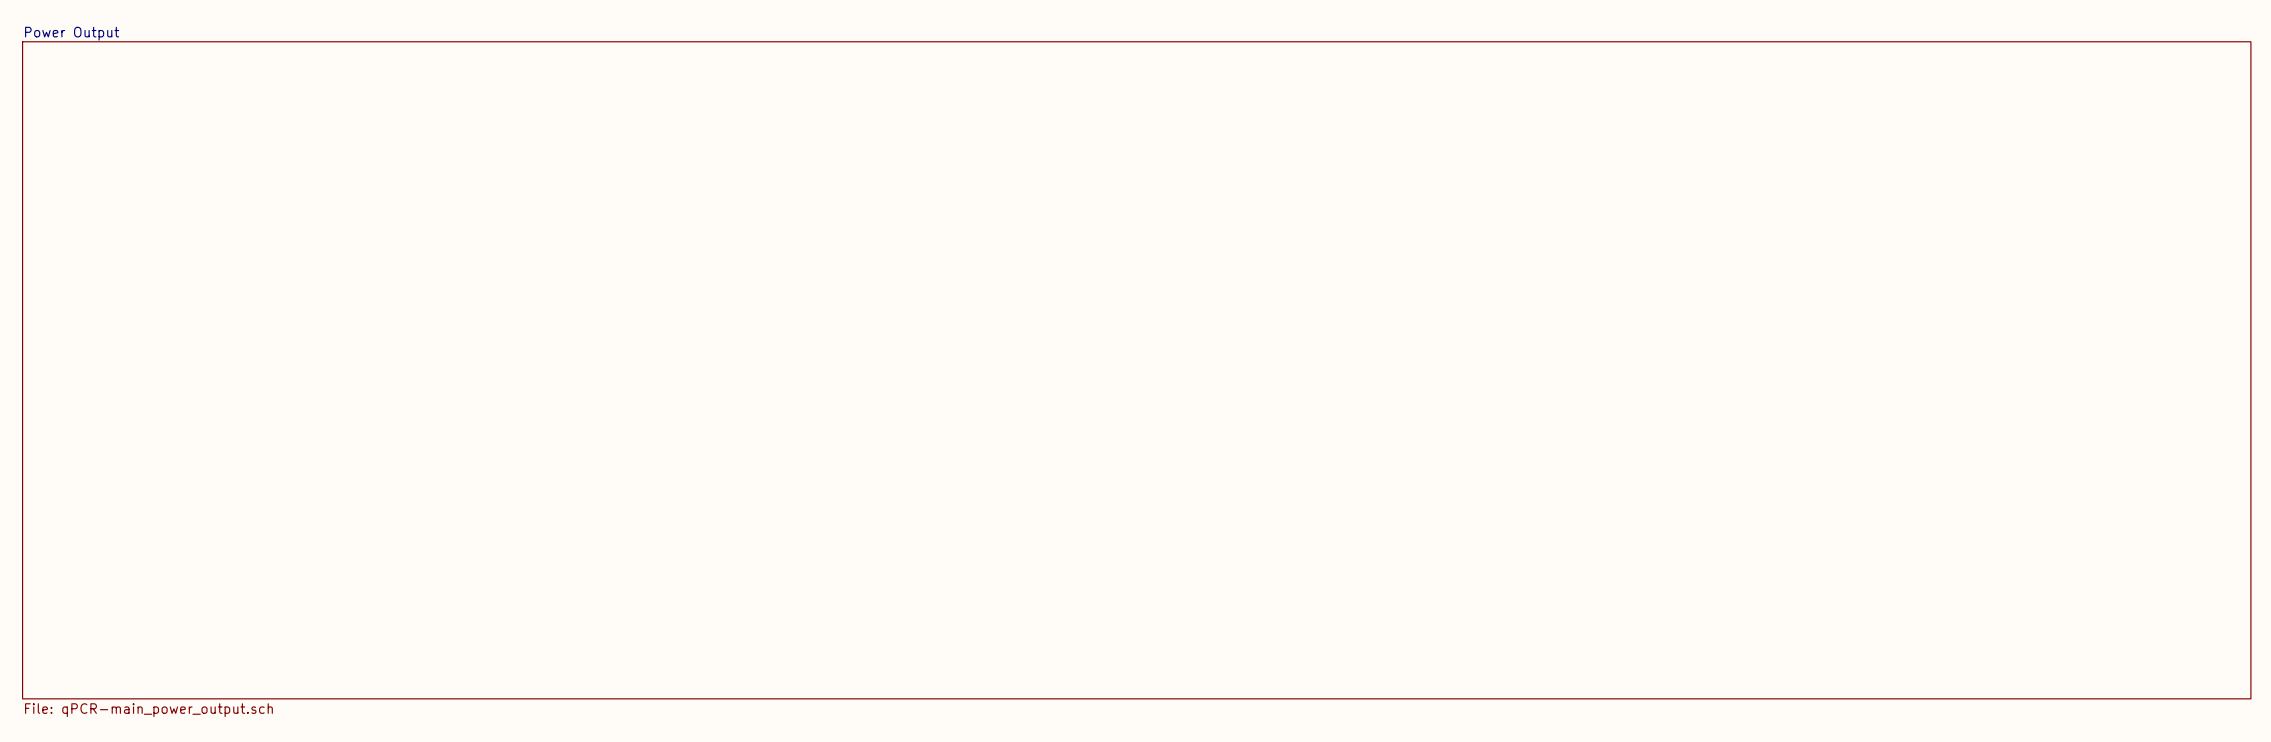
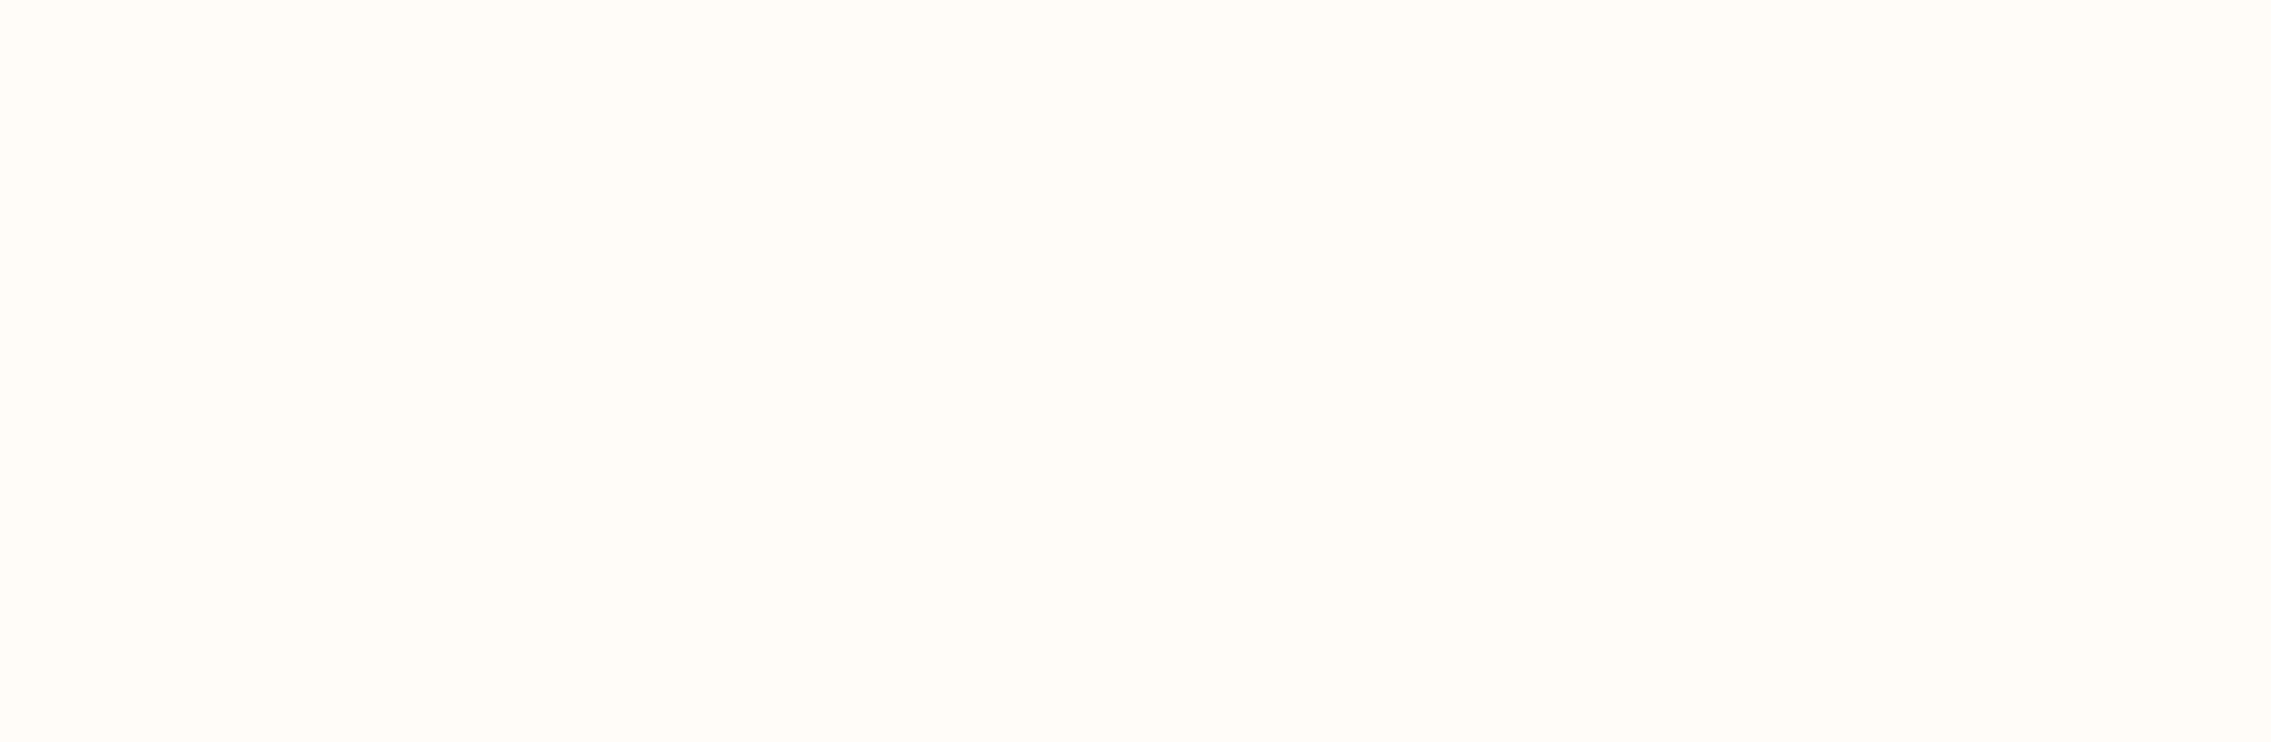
sheet Power Output: File: qPCR-main_power_output.sch (1136, 370) -> none

